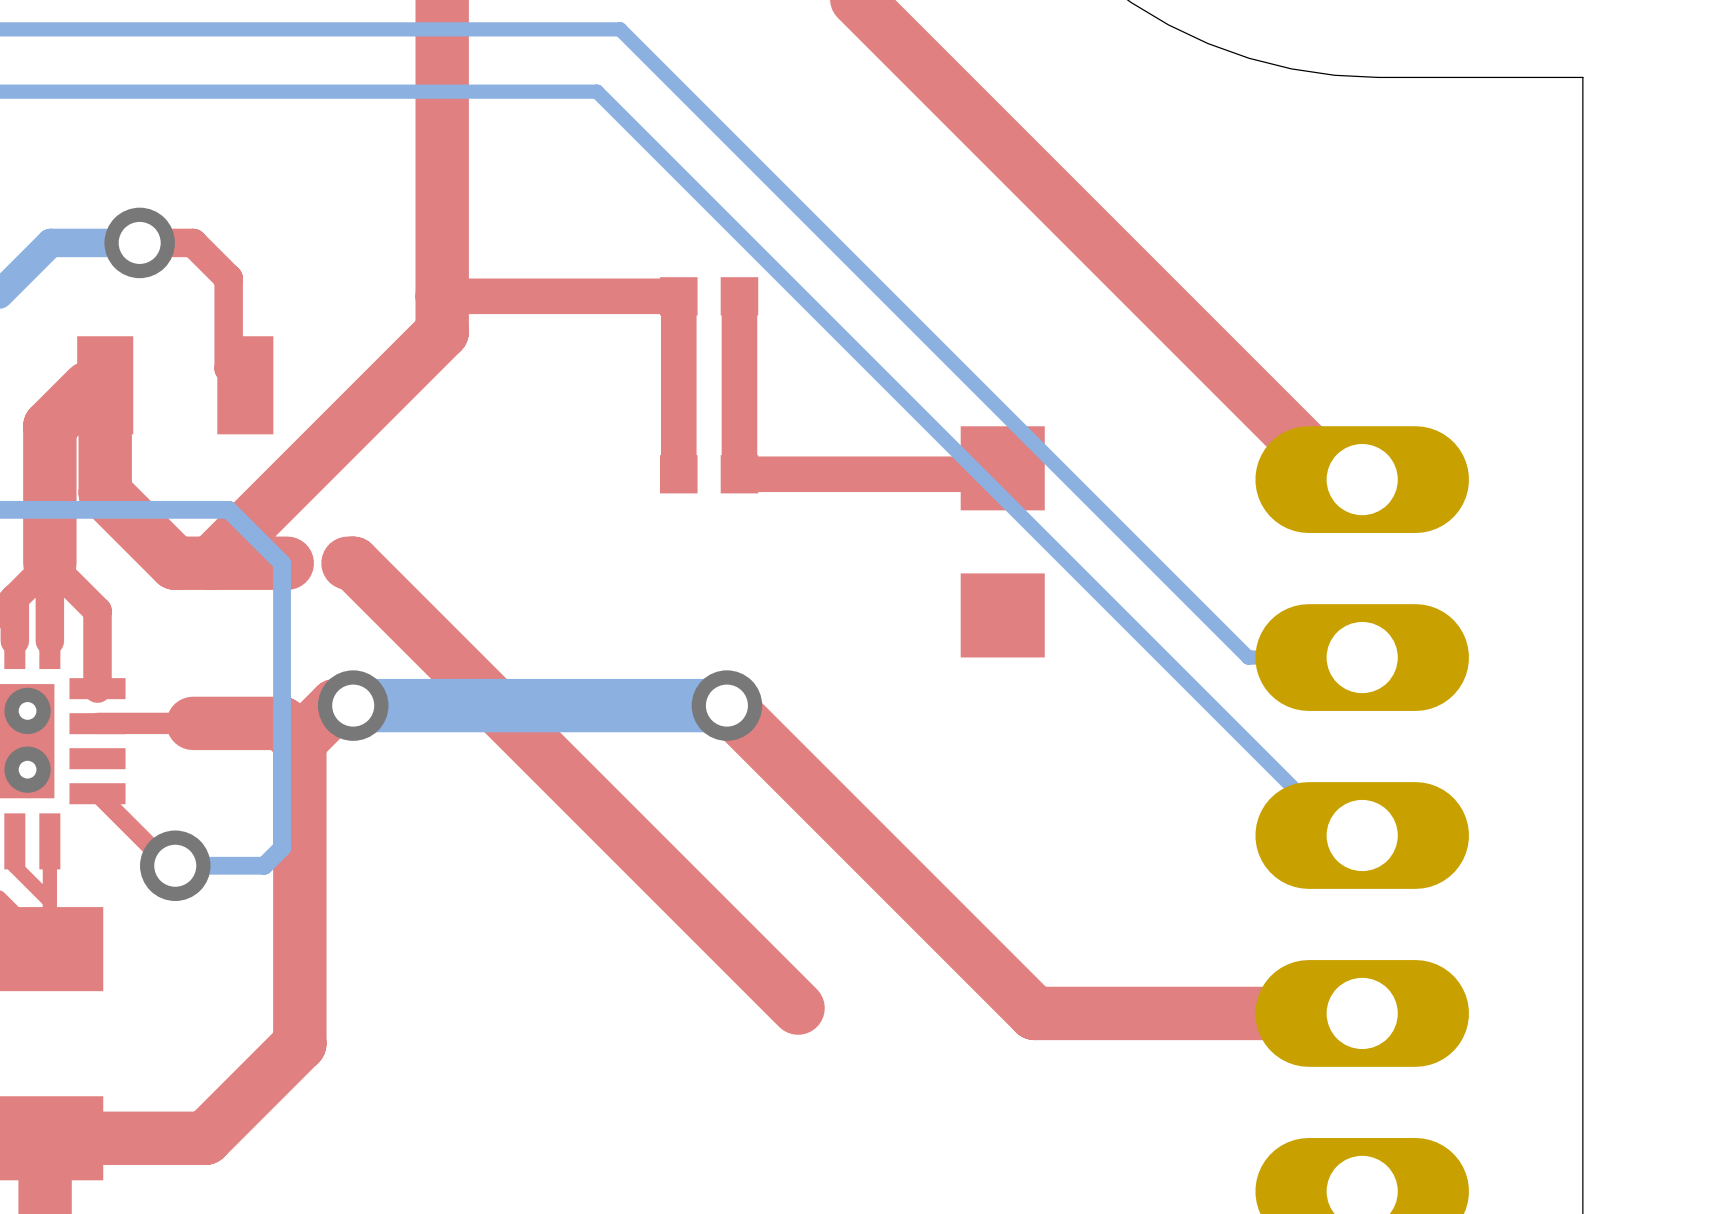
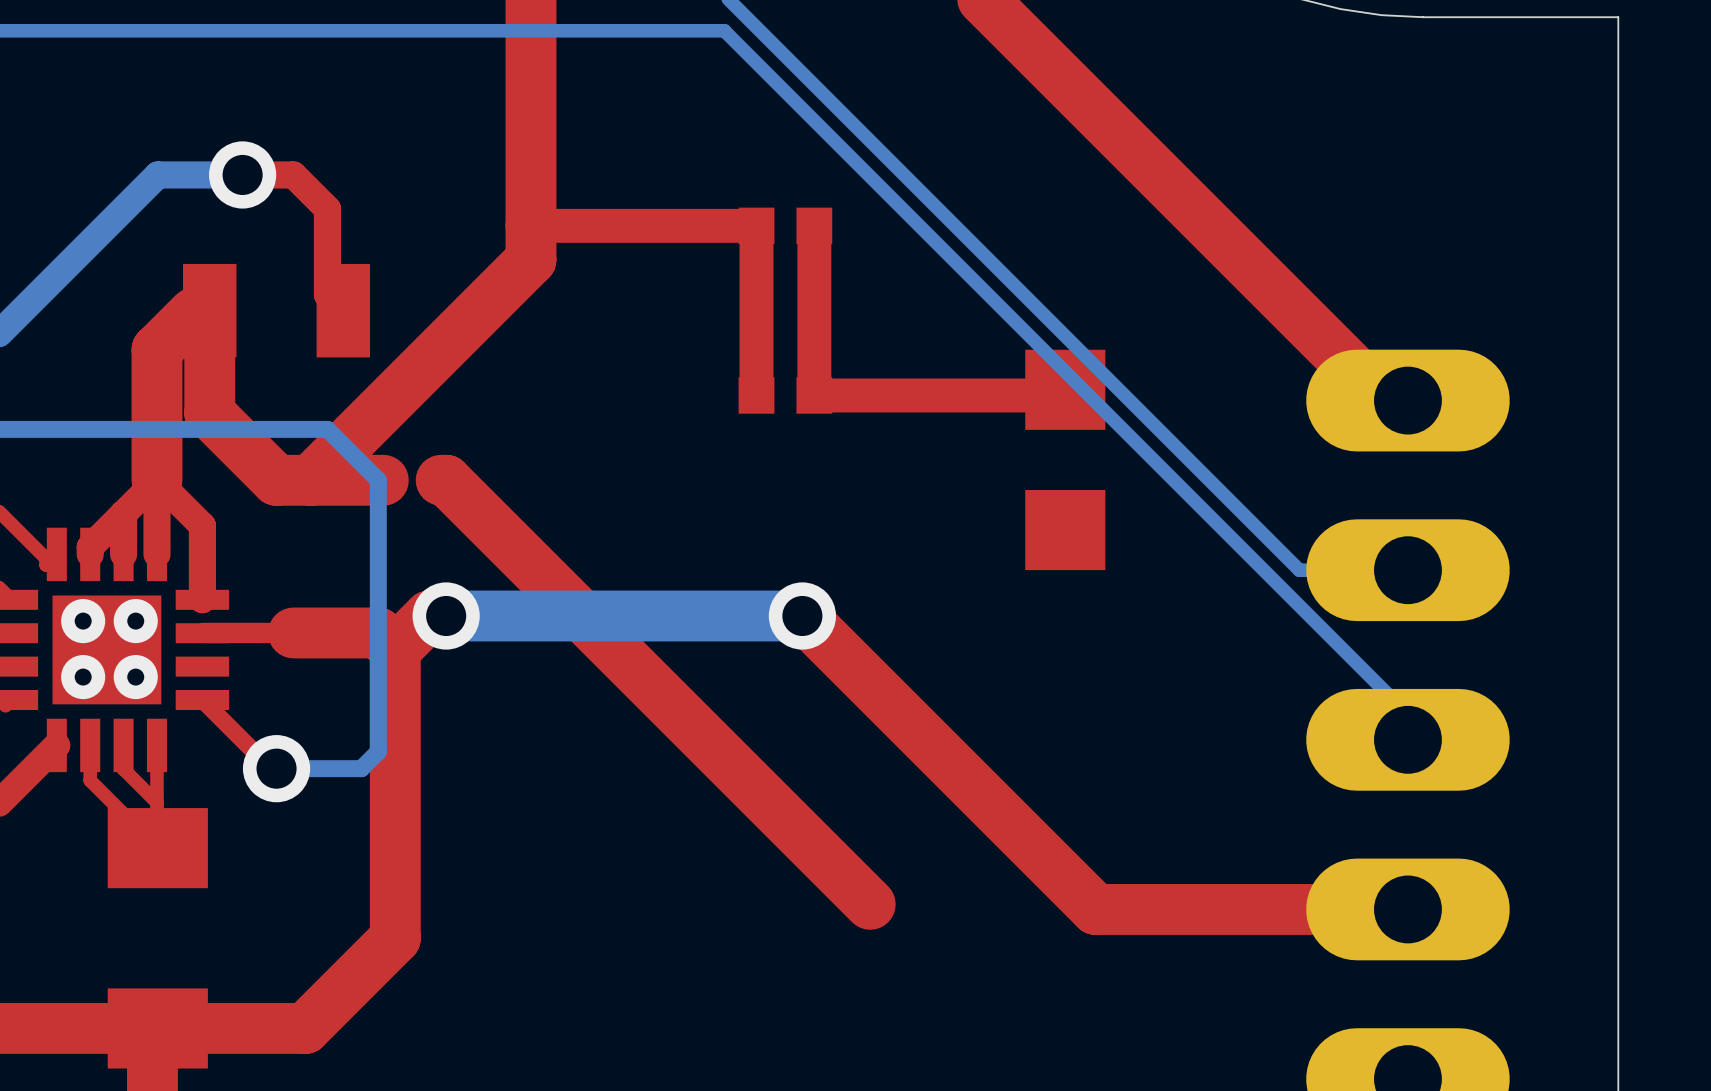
bottom track: (597, 91) (1340, 835) (1362, 835) -> (678, 30) (724, 30) (1407, 714) (1407, 739)

